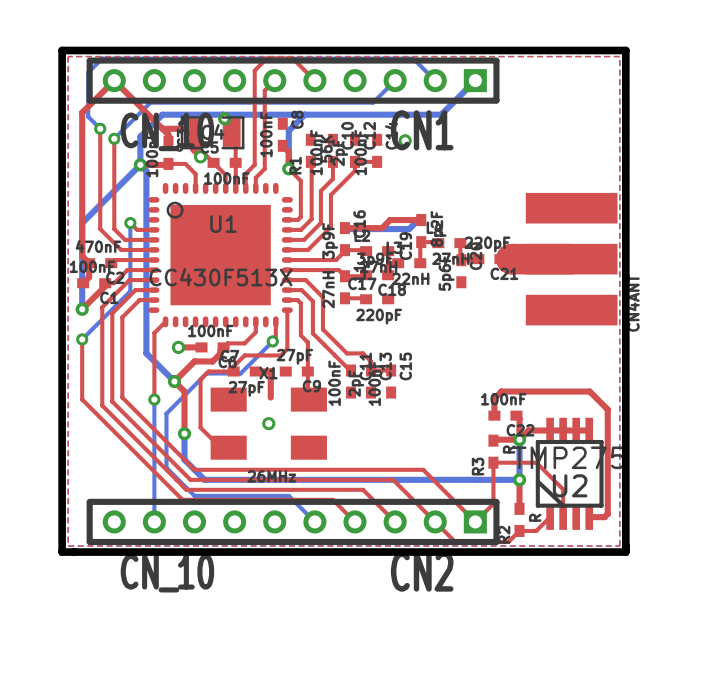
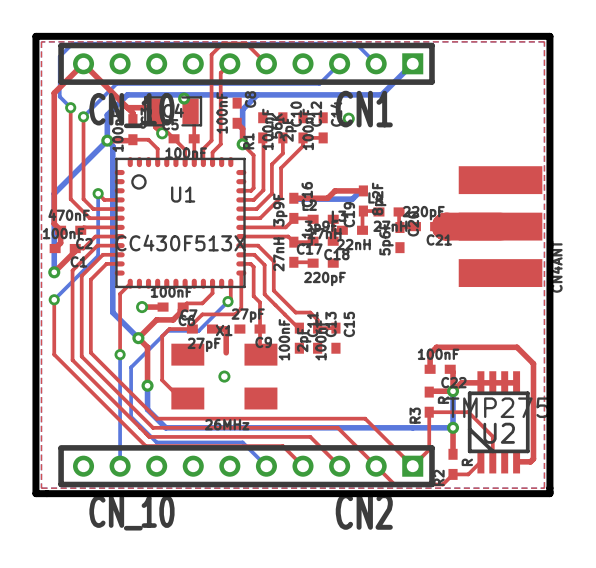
U1 footprint: [148, 182, 293, 328] -> [114, 157, 247, 289]

